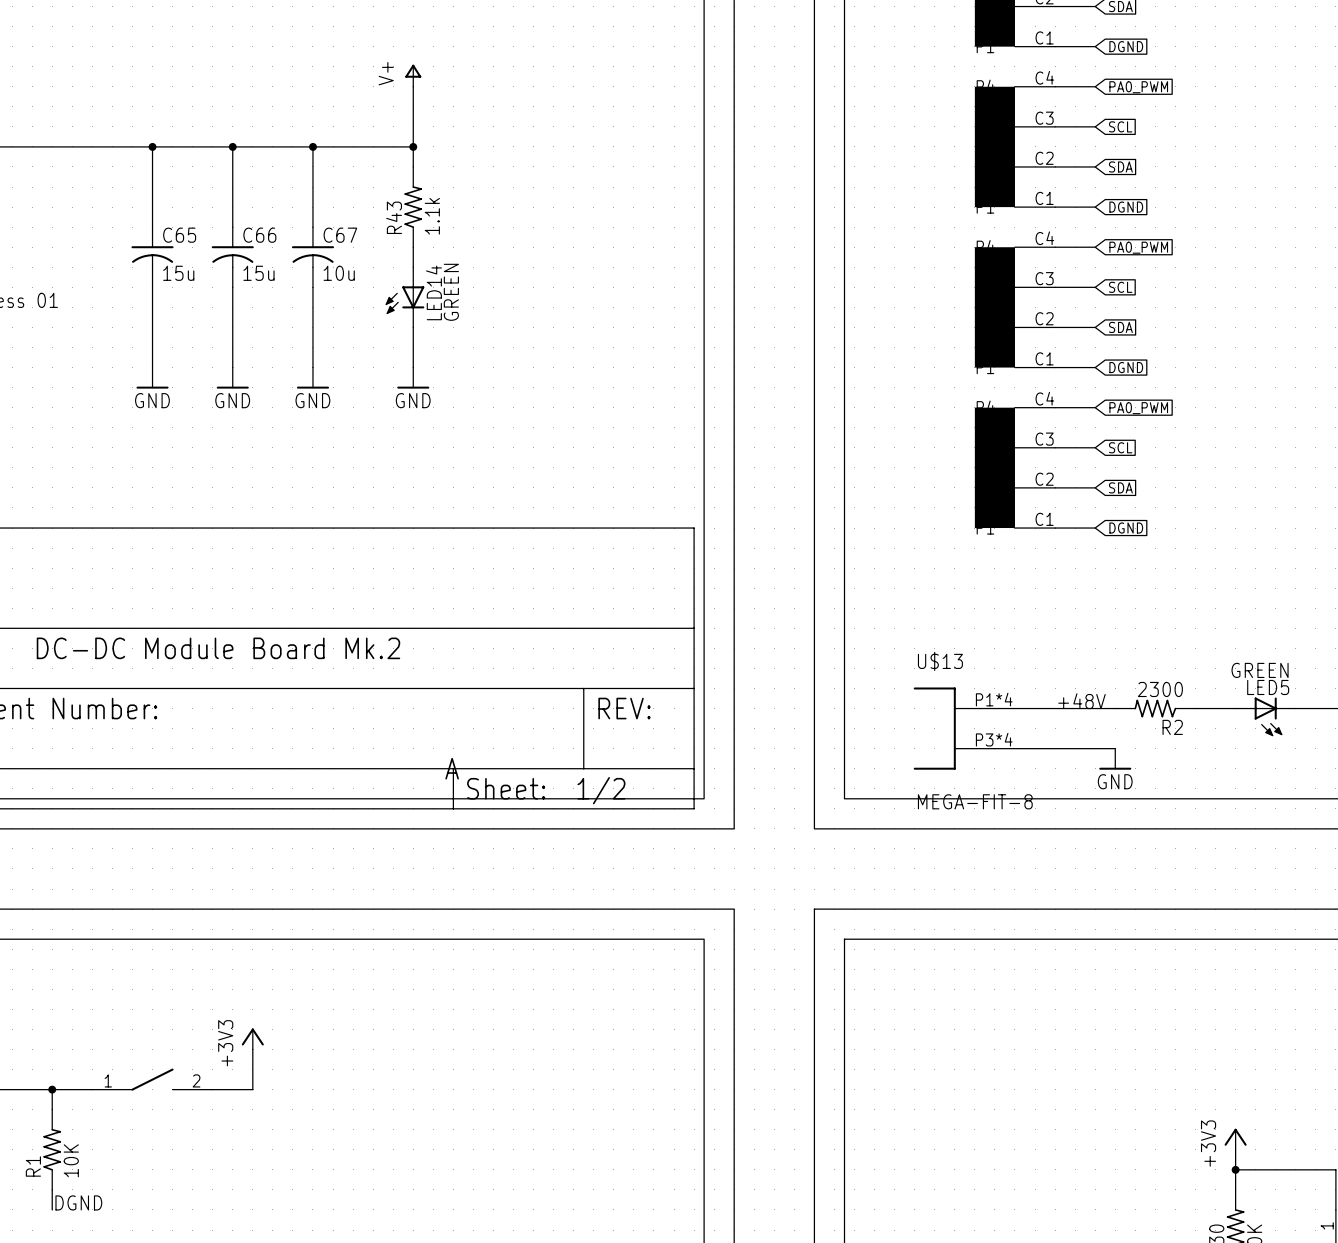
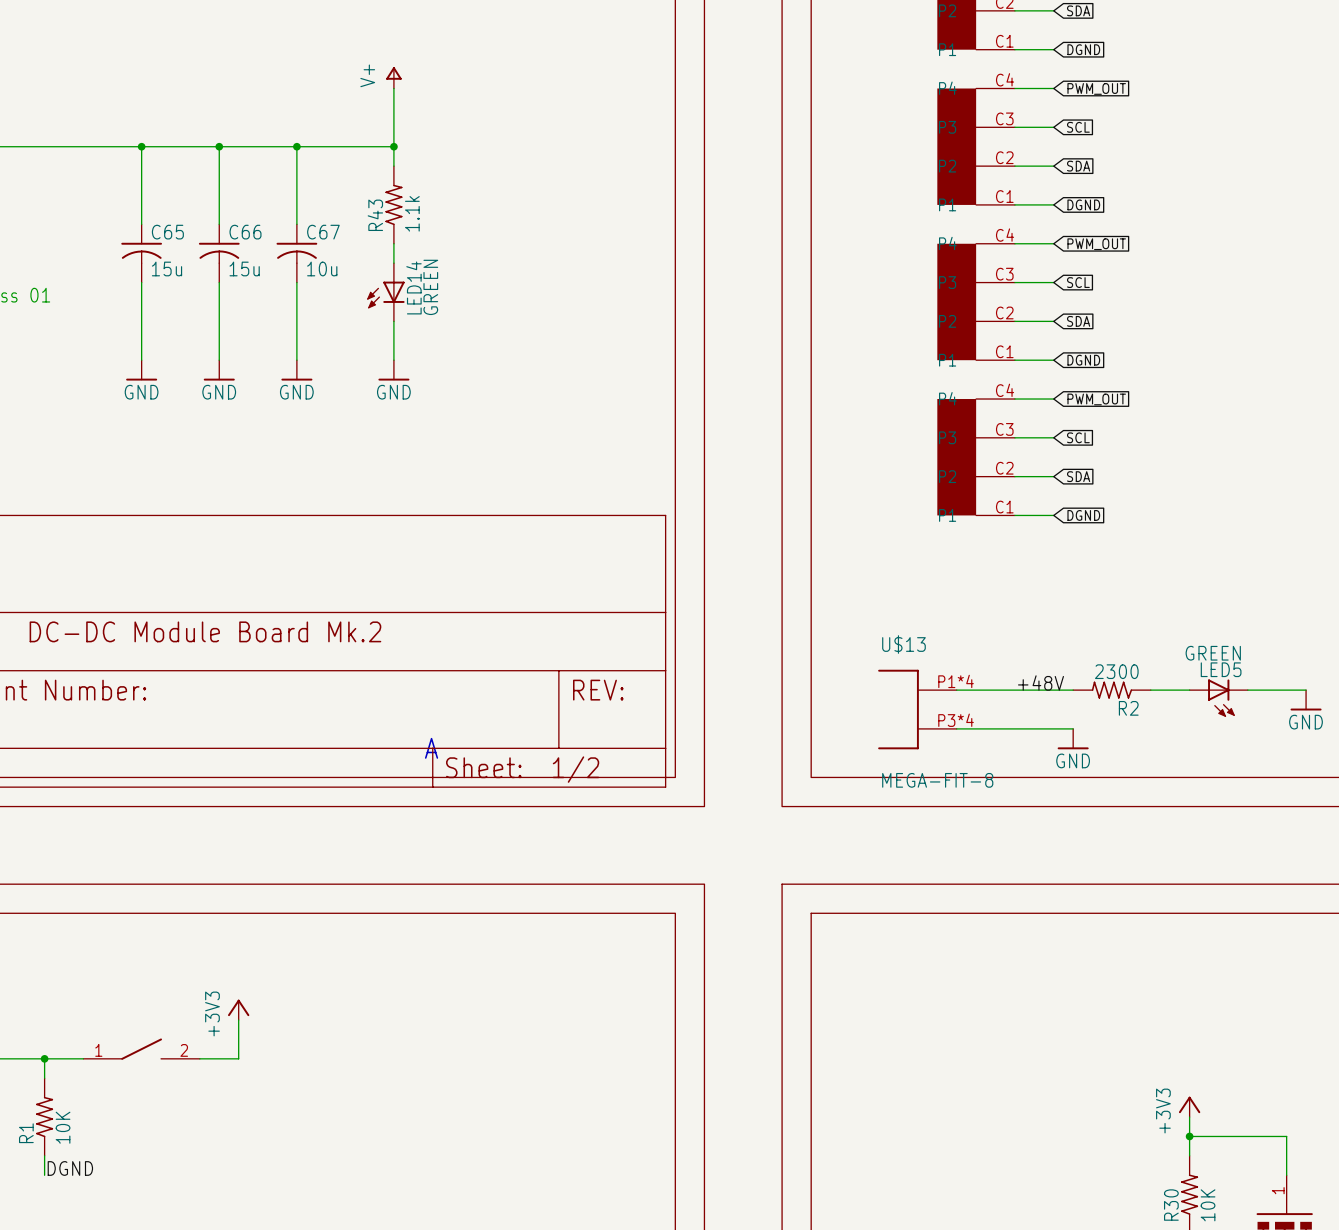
global label: PA0_PWM (1138, 87) -> PWM_OUT (1096, 88)
global label: PA0_PWM (1138, 247) -> PWM_OUT (1096, 244)
global label: PA0_PWM (1138, 408) -> PWM_OUT (1096, 399)

